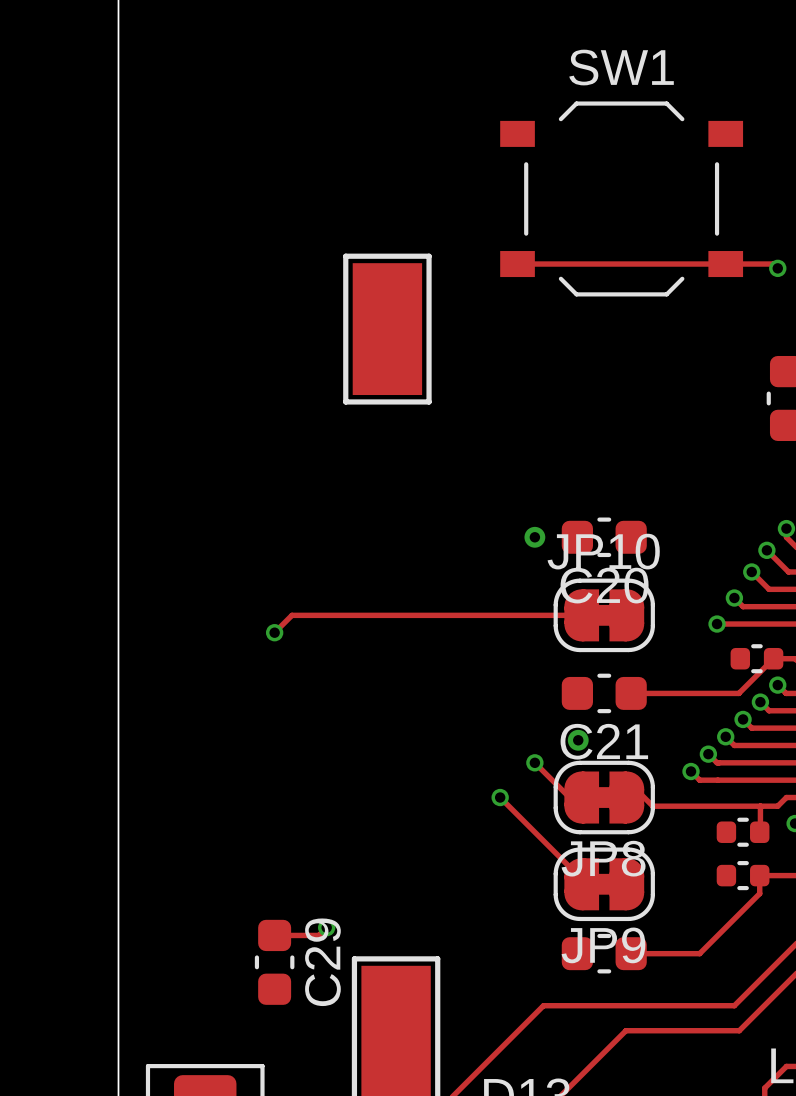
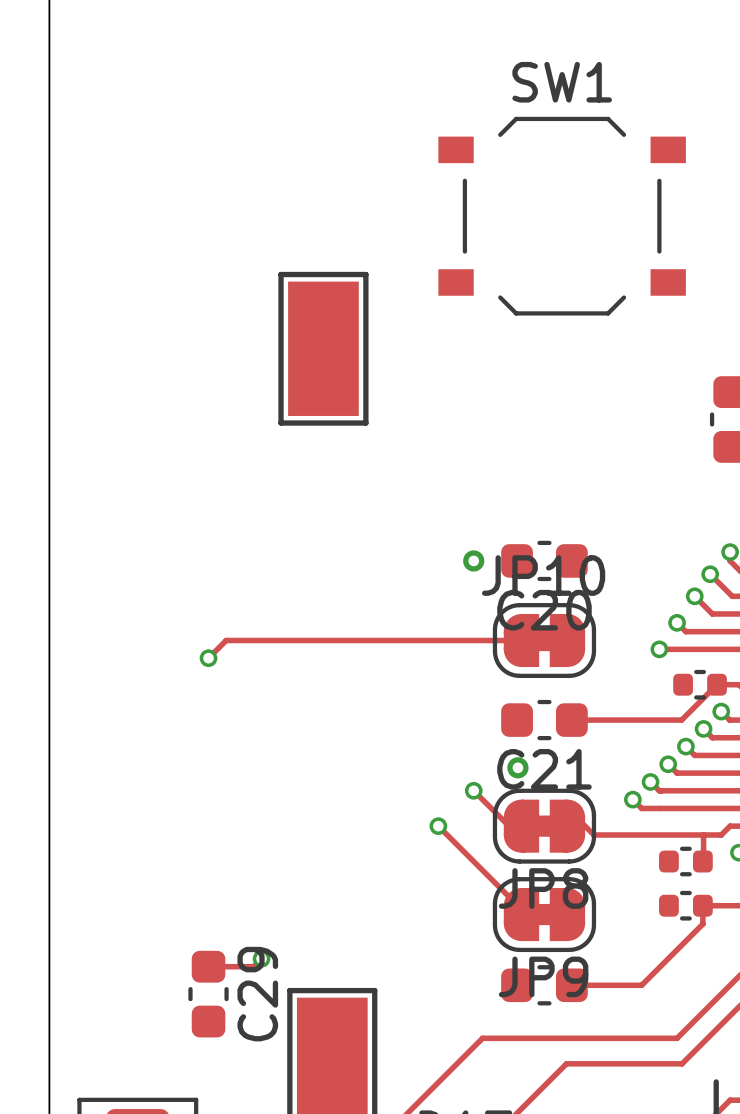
track: (517, 264) (773, 264) (777, 268) -> none
via: (777, 268) -> none

